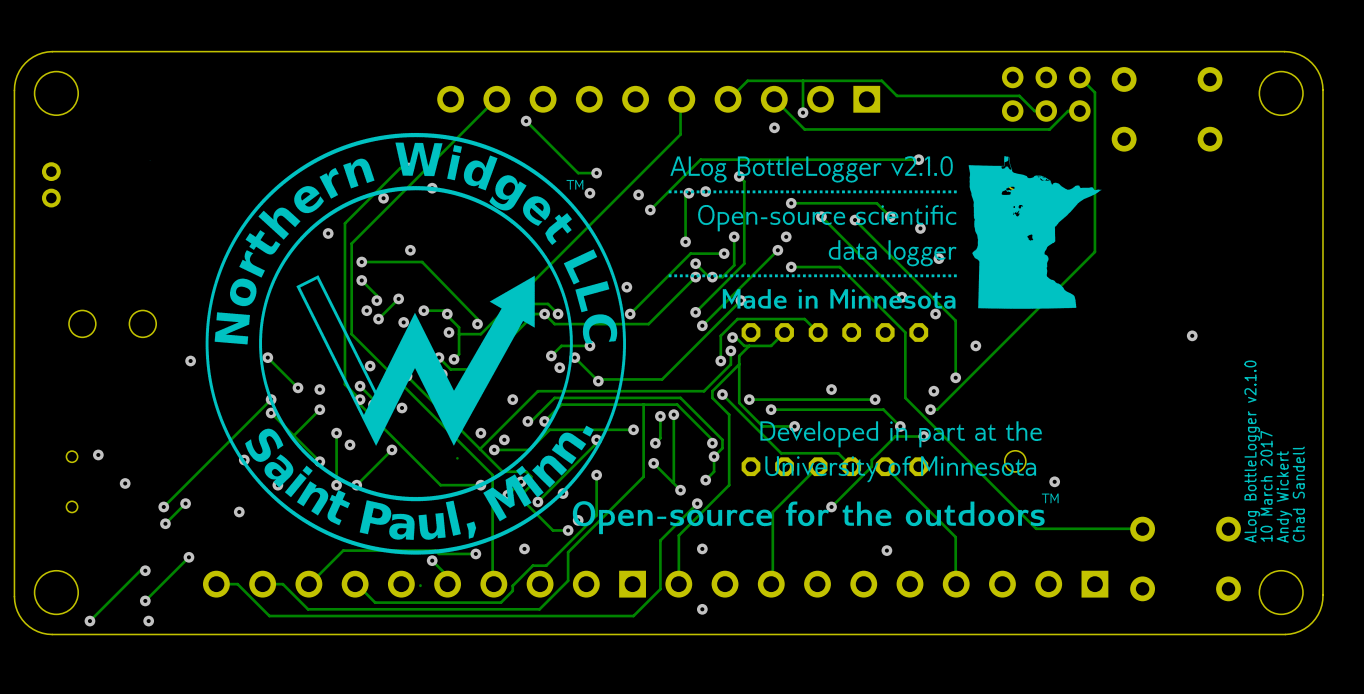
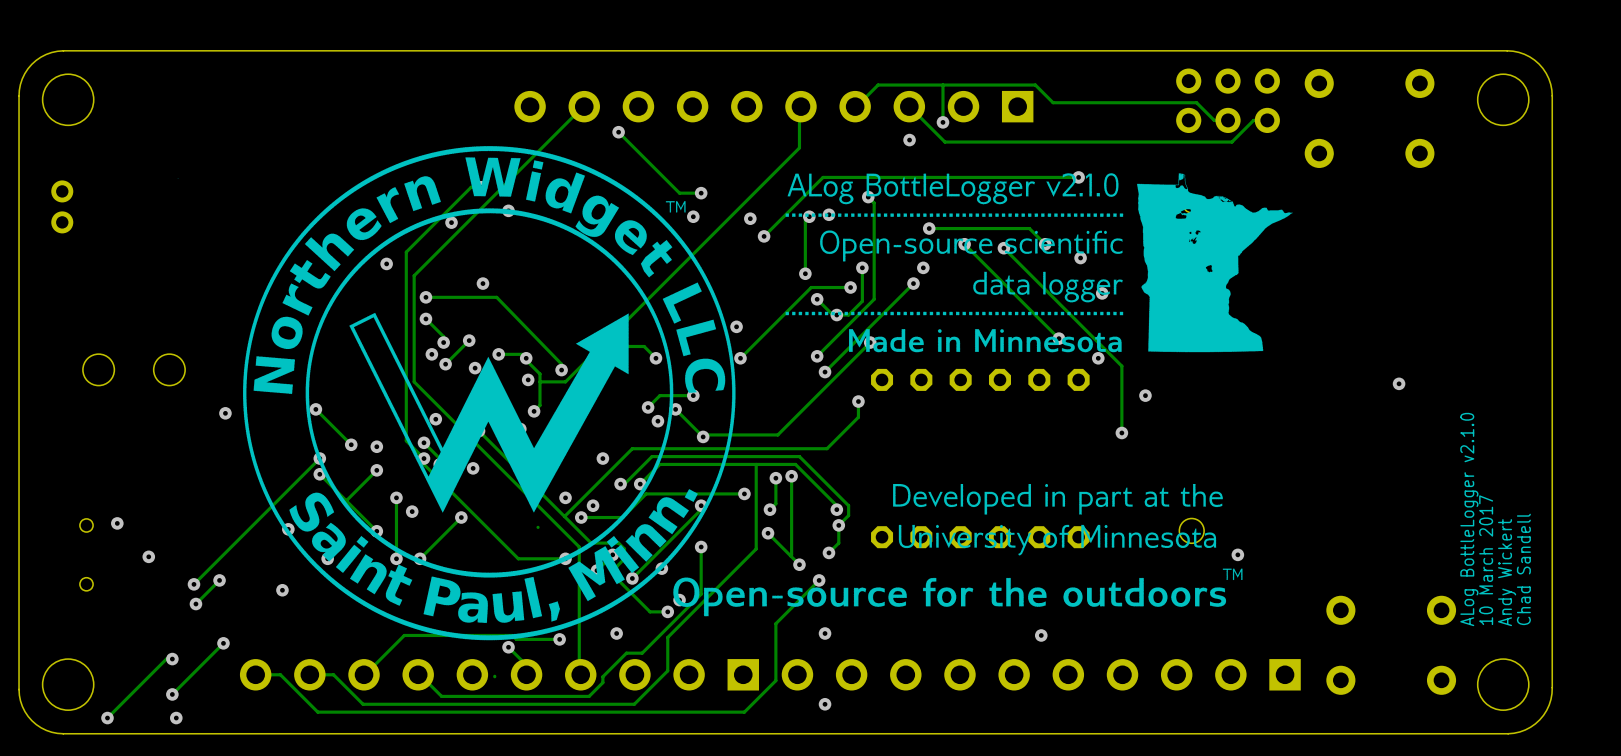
track: (1079, 77) (1094, 92) (1094, 251) (937, 409) (930, 409) -> none
track: (791, 267) (839, 267) (905, 332) (905, 397) (1036, 528) (1142, 529) -> none
via: (791, 267) -> none
track: (695, 277) (648, 324) (554, 324) (544, 314) (534, 314) (479, 369) (450, 369) (438, 357) -> none
via: (695, 277) -> none
via: (544, 314) -> none
track: (784, 332) (771, 345) (744, 345) (735, 337) (732, 337) -> none
track: (818, 332) (804, 319) (737, 319) (720, 335) (720, 361) -> none
via: (732, 337) -> none
track: (749, 345) (739, 355) (739, 402) (762, 426) (794, 426) -> none
via: (438, 357) -> none
via: (720, 361) -> none
track: (739, 364) (712, 391) (712, 397) (729, 414) (729, 485) (678, 535) (678, 584) -> none
via: (831, 389) -> none
via: (933, 391) -> none
track: (722, 394) (781, 453) (838, 453) (851, 466) -> none
via: (722, 394) -> none
via: (749, 399) -> none
track: (875, 399) (749, 399) -> none
via: (875, 399) -> none
track: (771, 409) (883, 409) (900, 426) -> none
via: (771, 409) -> none
via: (930, 409) -> none
via: (794, 426) -> none
via: (900, 426) -> none
track: (923, 436) (895, 436) (871, 459) (871, 466) (831, 506) -> none
via: (923, 436) -> none
track: (818, 466) (772, 512) (772, 584) (771, 584) -> none
track: (885, 466) (955, 537) (956, 584) -> none
via: (831, 506) -> none

